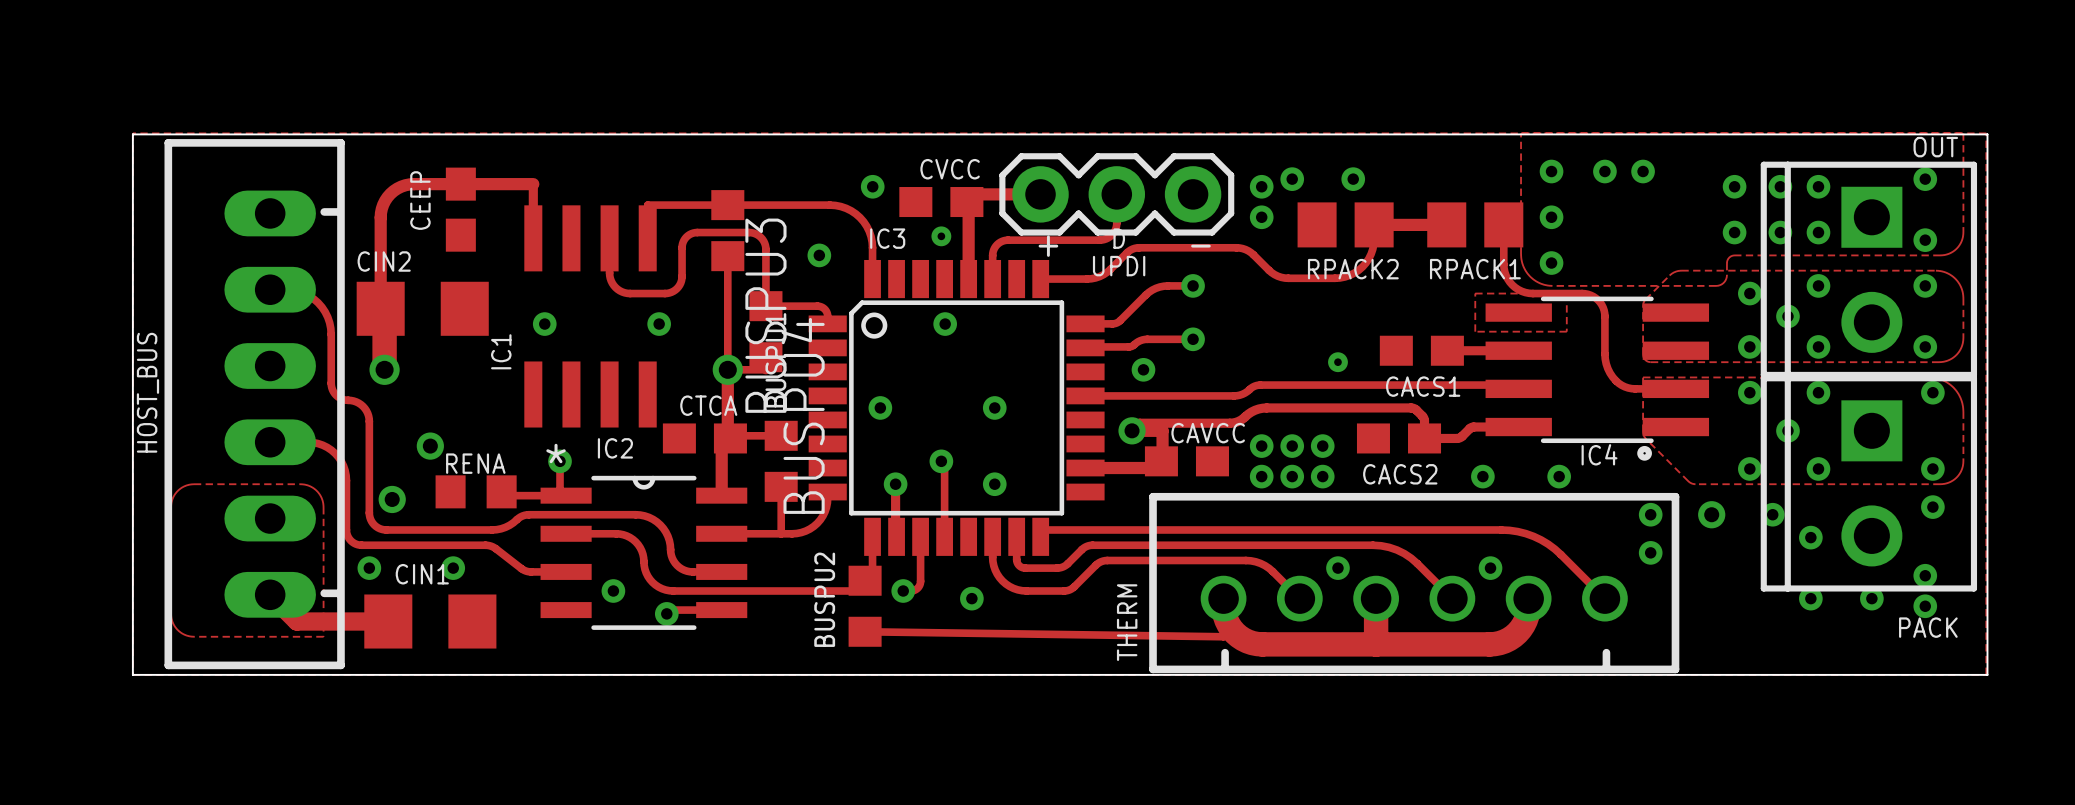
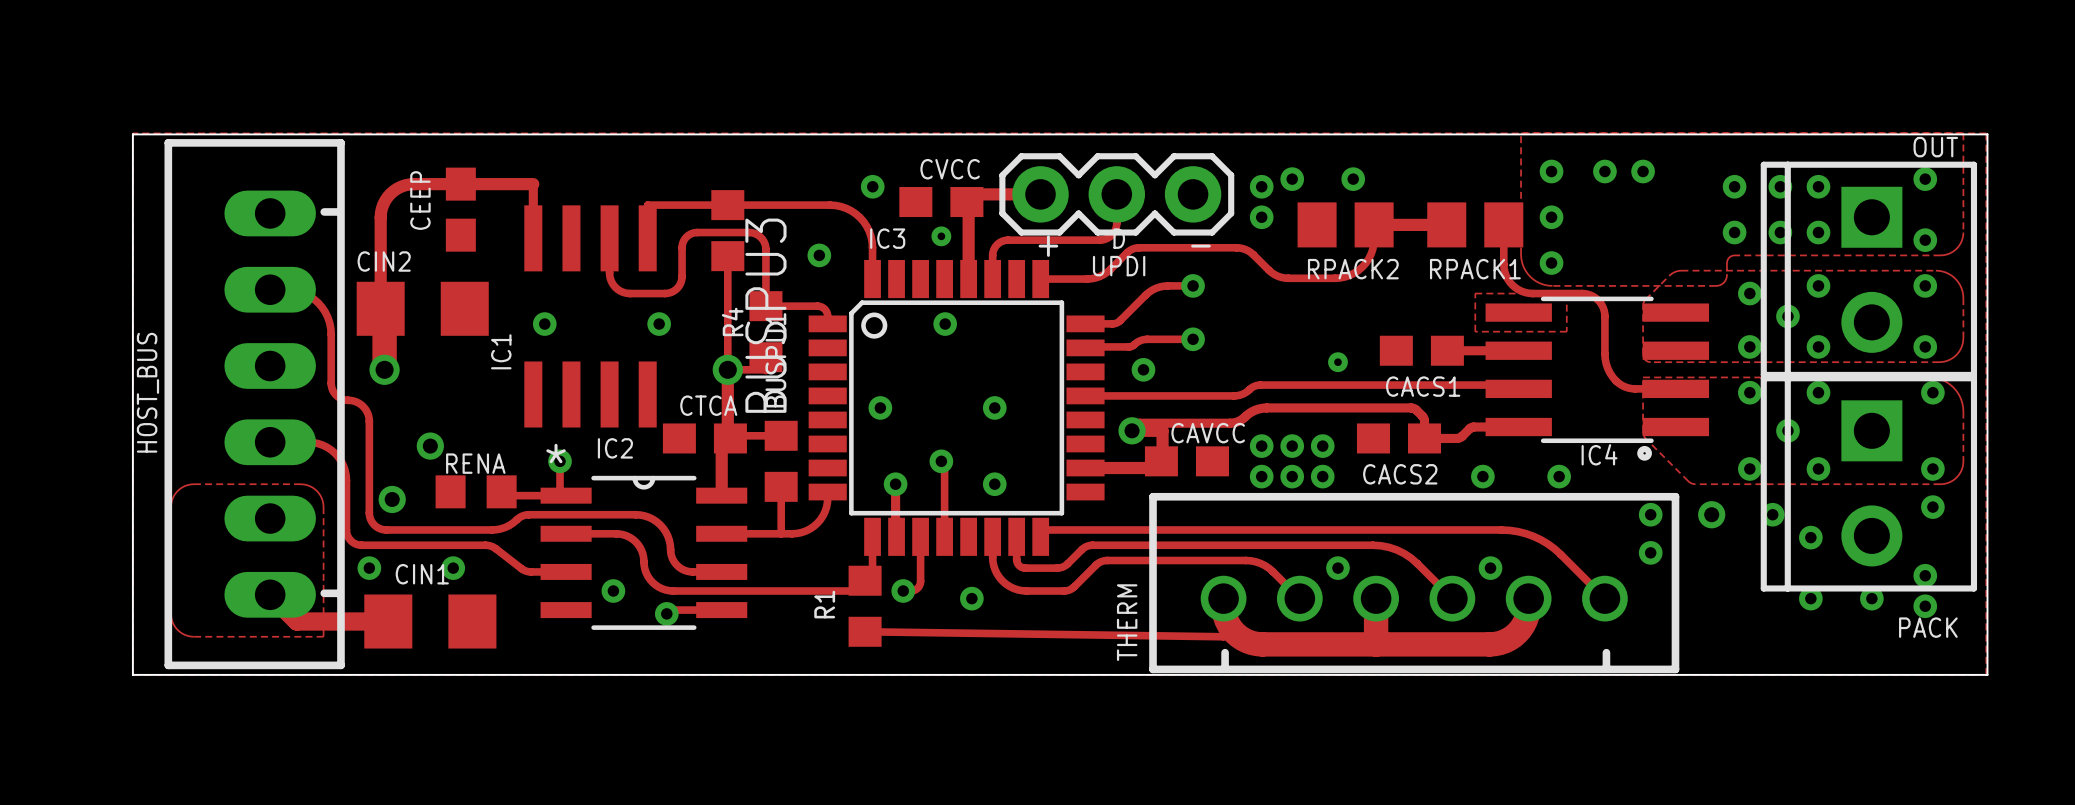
BUSPU4 name: BUSPU4 (803, 415) -> R4 (732, 321)
BUSPU2 name: BUSPU2 (824, 599) -> R1 (824, 604)

